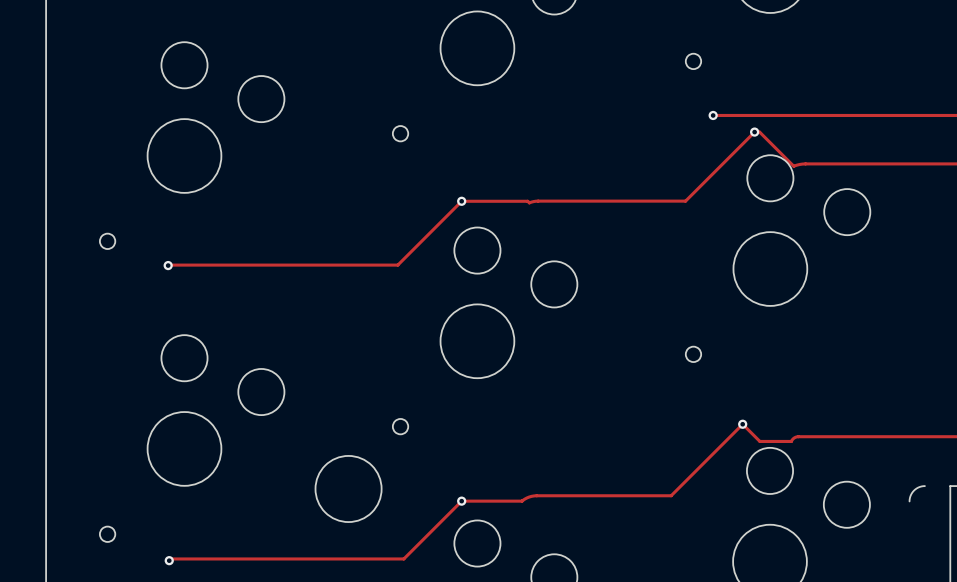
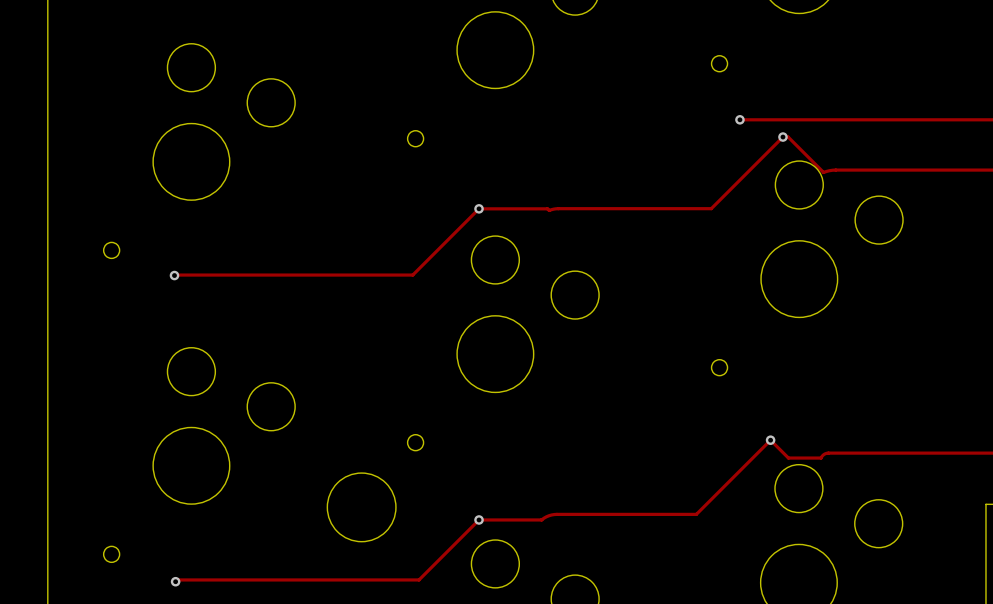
board edge: (924, 486) (914, 490) (909, 501) -> none

